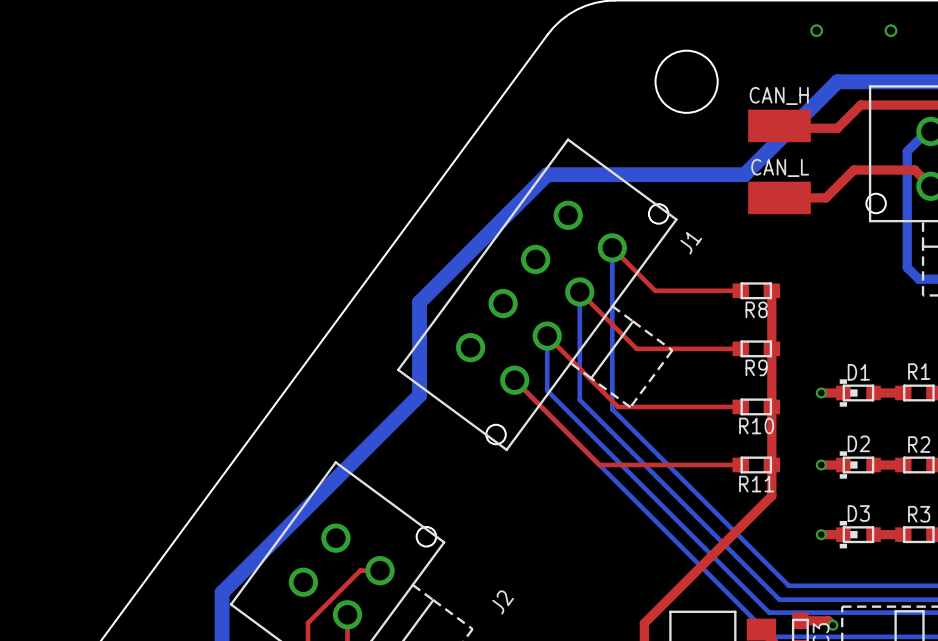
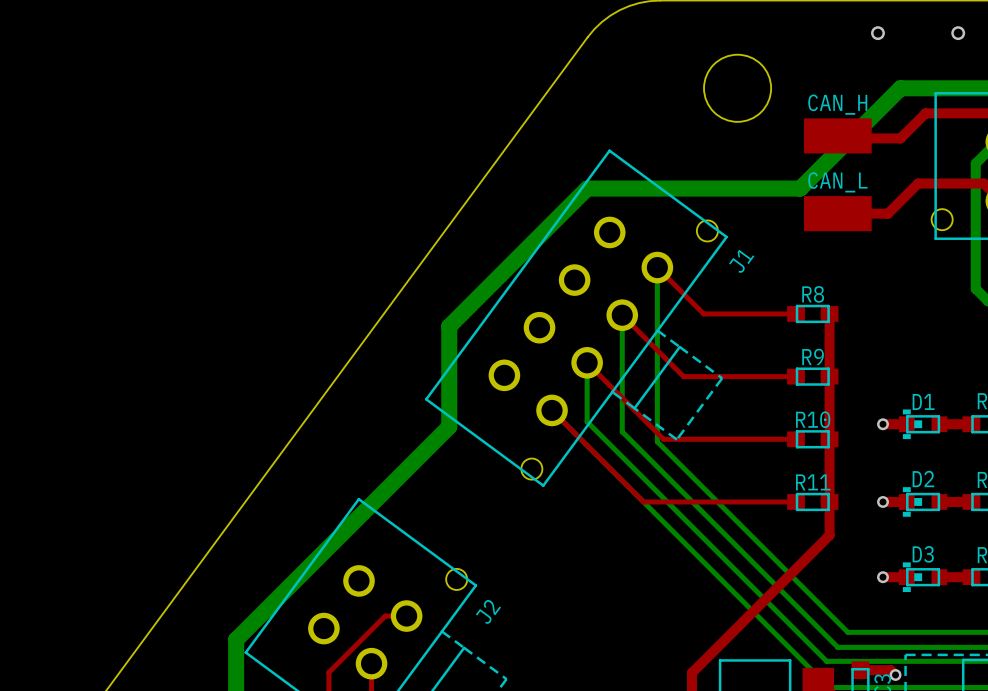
R8 name position: R8 (756, 309) -> R8 (813, 294)
R9 name position: R9 (756, 367) -> R9 (813, 356)
R10 name position: R10 (756, 425) -> R10 (813, 419)
R11 name position: R11 (756, 484) -> R11 (813, 482)
J2 name position: J2 (503, 602) -> J2 (488, 611)

